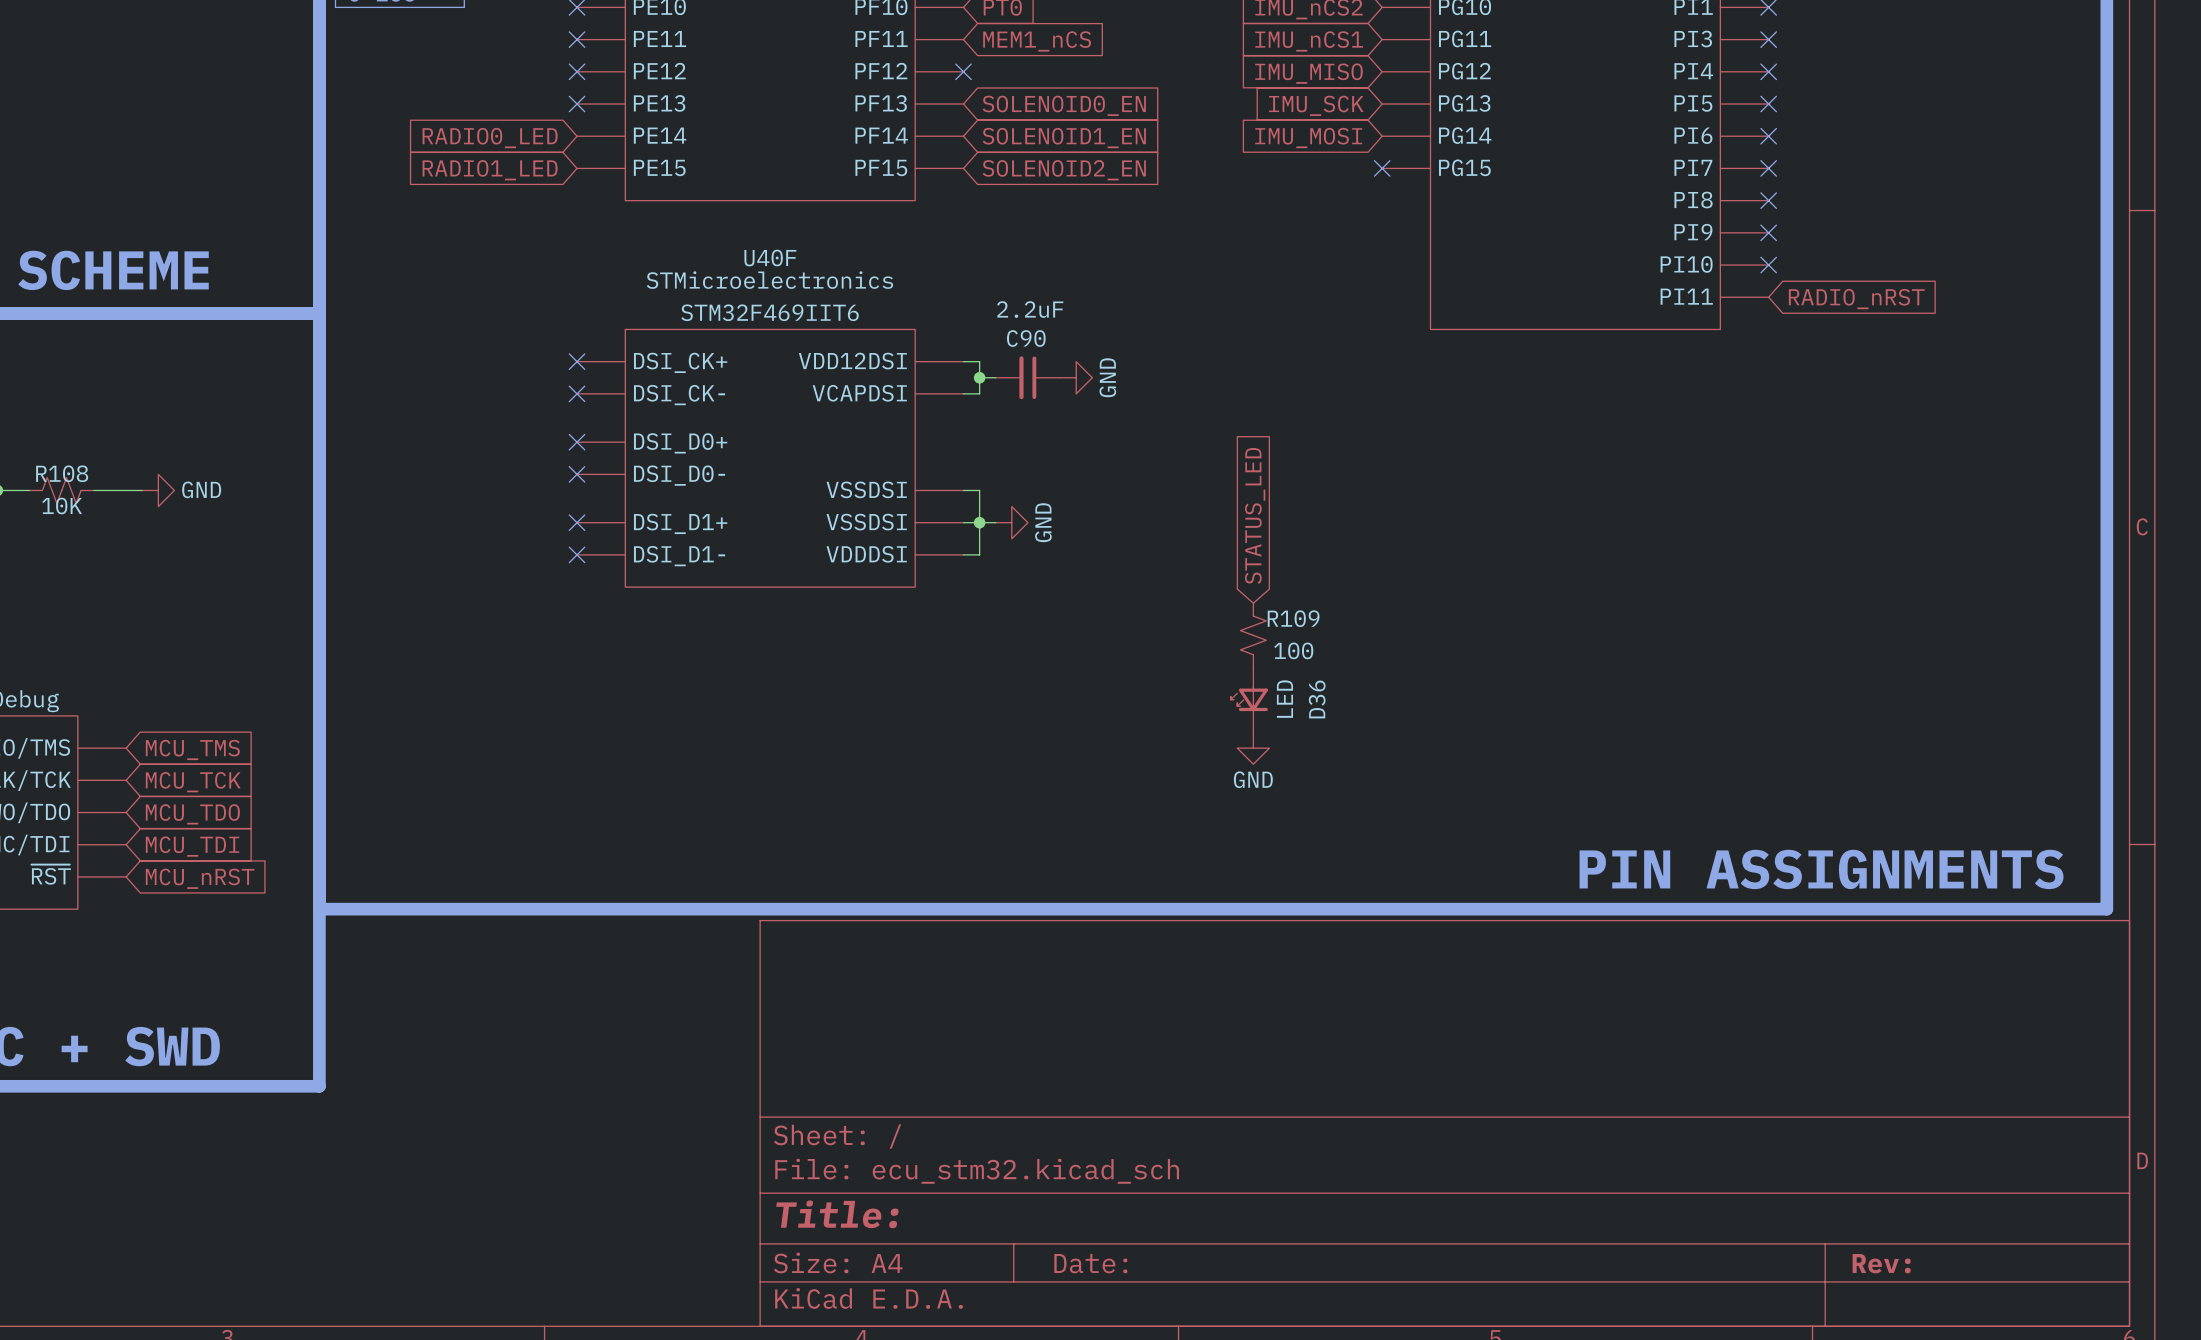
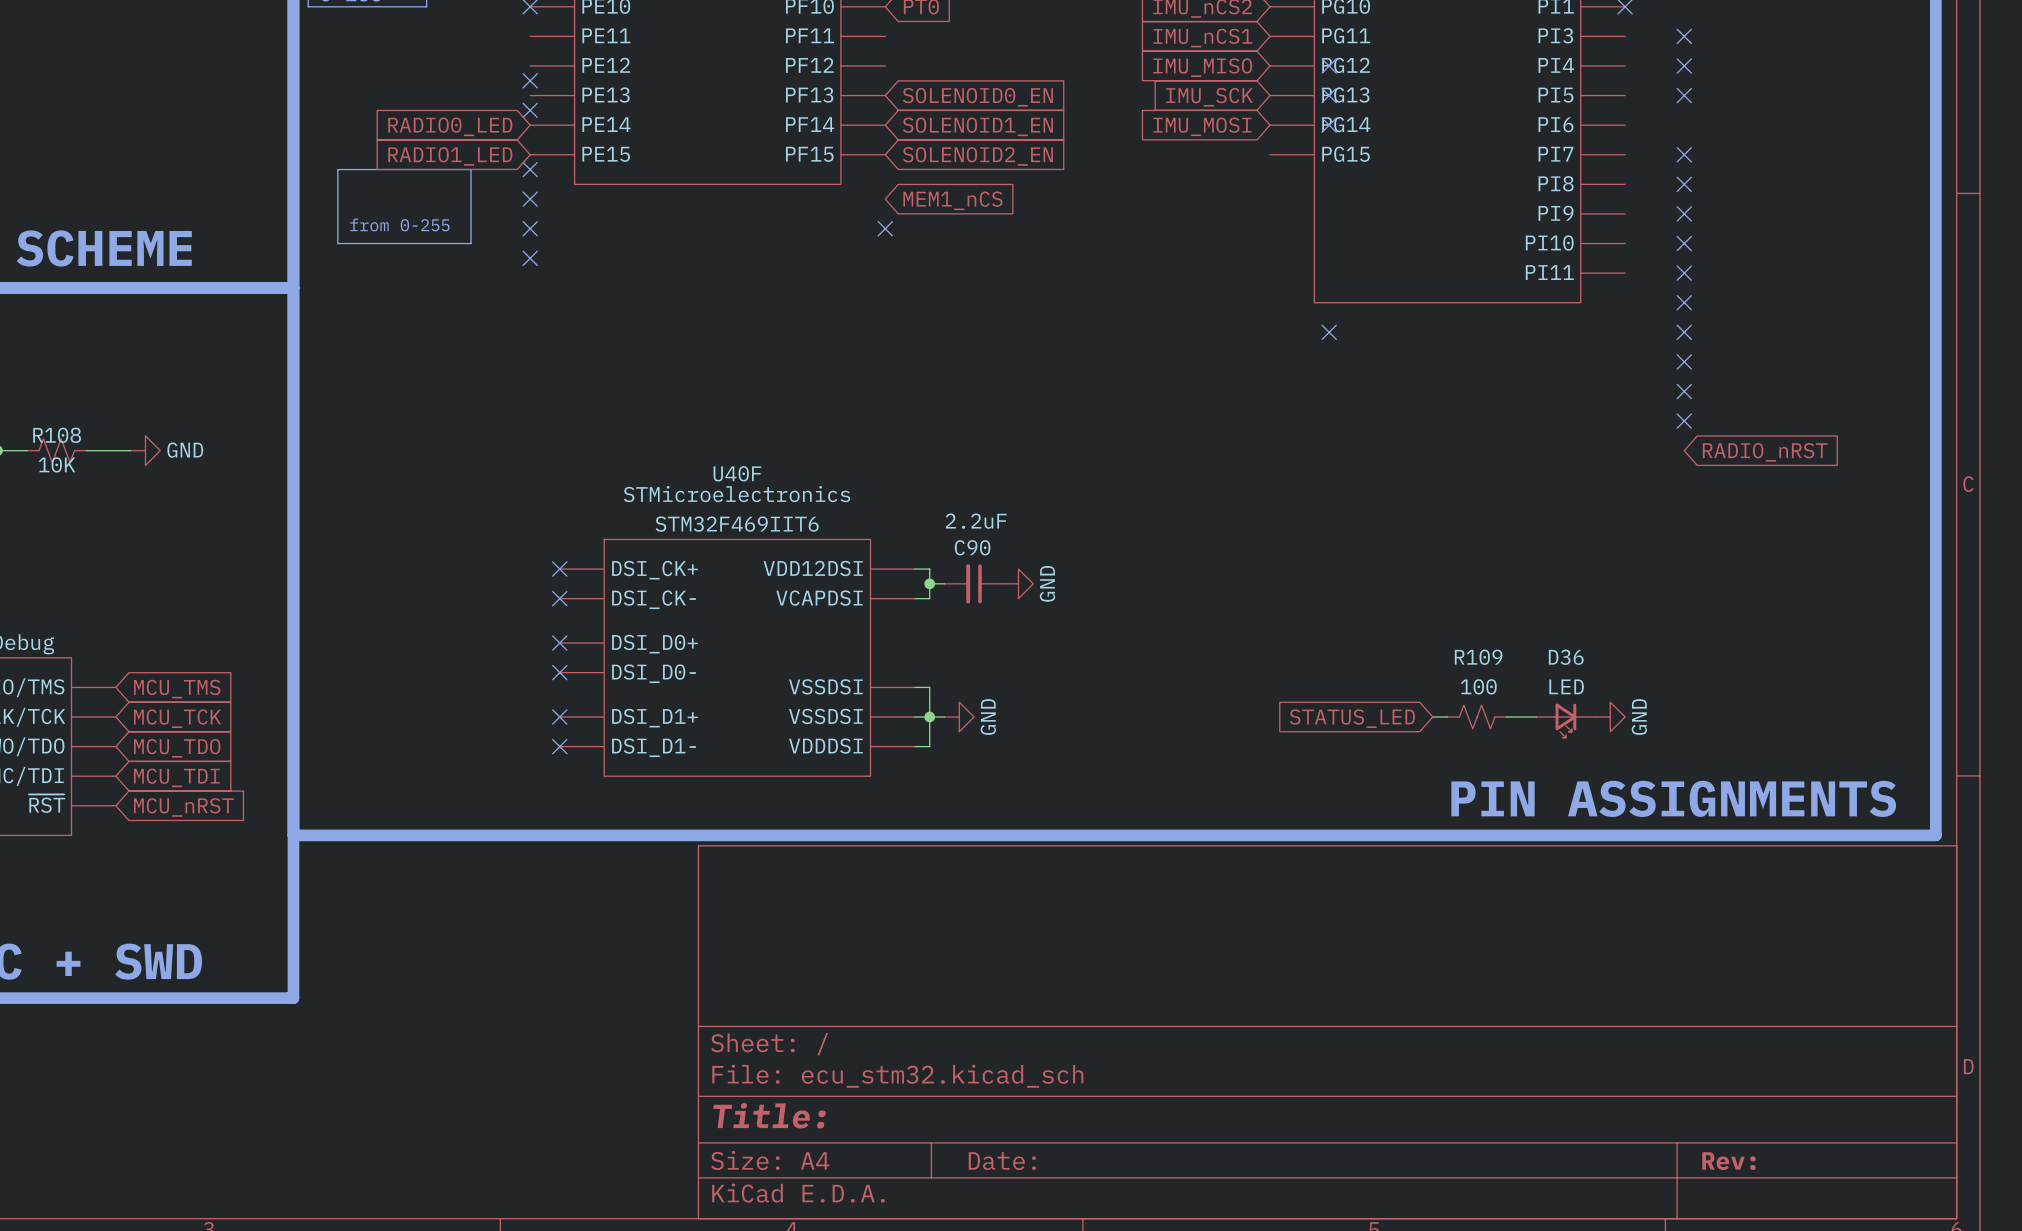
no-connect mark: (577, 39) -> none
no-connect mark: (1768, 39) -> none
no-connect mark: none -> (1684, 36)
global label position: MEM1_nCS (1037, 41) -> MEM1_nCS (952, 200)
no-connect mark: (577, 71) -> none
no-connect mark: (963, 71) -> none
no-connect mark: none -> (1329, 65)
no-connect mark: (1768, 71) -> none
no-connect mark: none -> (1684, 65)
no-connect mark: none -> (530, 80)
no-connect mark: (577, 104) -> none
no-connect mark: none -> (1329, 95)
no-connect mark: (1768, 104) -> none
no-connect mark: none -> (1684, 95)
no-connect mark: none -> (530, 110)
no-connect mark: none -> (1329, 125)
no-connect mark: (1768, 136) -> none
no-connect mark: (1382, 168) -> none
no-connect mark: (1768, 168) -> none
no-connect mark: none -> (1684, 154)
line: none -> (337, 169) (471, 169) (471, 243) (337, 243) (337, 169)
no-connect mark: none -> (530, 169)
no-connect mark: (1768, 200) -> none
no-connect mark: none -> (1684, 184)
no-connect mark: none -> (530, 199)
no-connect mark: (1768, 232) -> none
no-connect mark: none -> (1684, 213)
text: none -> from 0-255 (399, 224)
no-connect mark: none -> (530, 228)
no-connect mark: none -> (885, 228)
no-connect mark: (1768, 265) -> none
no-connect mark: none -> (1684, 243)
no-connect mark: none -> (530, 258)
no-connect mark: none -> (1684, 273)
global label position: RADIO_nRST (1856, 299) -> RADIO_nRST (1765, 452)
no-connect mark: none -> (1684, 302)
no-connect mark: (577, 361) -> none
wire: (963, 361) (979, 361) (979, 393) (963, 393) -> (914, 569) (929, 569) (929, 598) (914, 598)
no-connect mark: none -> (1329, 332)
no-connect mark: none -> (1684, 332)
wire: (979, 377) (995, 377) -> (929, 583) (944, 583)
junction: (979, 377) -> none
C90 position: (1027, 377) -> (974, 583)
power symbol: GND (1076, 377) -> none
no-connect mark: (577, 393) -> none
no-connect mark: none -> (1684, 361)
no-connect mark: none -> (1684, 391)
no-connect mark: (577, 442) -> none
U40F position: (770, 458) -> (737, 657)
no-connect mark: none -> (1684, 421)
no-connect mark: (577, 474) -> none
wire: (963, 490) (979, 490) (979, 554) (963, 554) -> (914, 687) (929, 687) (929, 746) (914, 746)
global label: STATUS_LED (1255, 516) -> none
no-connect mark: (577, 522) -> none
wire: (963, 522) (995, 522) -> (914, 717) (944, 717)
junction: (979, 522) -> none
power symbol: GND (1011, 522) -> none
no-connect mark: (577, 554) -> none
R109 name position: R109 (1293, 618) -> R109 (1478, 657)
no-connect mark: none -> (559, 569)
junction: none -> (929, 583)
power symbol: none -> GND (1018, 583)
R109 rotation: 0° (1253, 635) -> 90° clockwise (1477, 717)
R109 position: (1253, 635) -> (1477, 717)
R109 value position: 100 (1293, 650) -> 100 (1478, 686)
no-connect mark: none -> (559, 598)
no-connect mark: none -> (559, 643)
D36 rotation: 0° (1249, 699) -> 90° counterclockwise (1565, 720)
D36 position: (1249, 699) -> (1565, 720)
no-connect mark: none -> (559, 672)
power symbol: GND (1253, 748) -> none
no-connect mark: none -> (559, 717)
junction: none -> (929, 717)
power symbol: none -> GND (959, 717)
wire: none -> (1432, 717) (1447, 717)
wire: none -> (1506, 717) (1536, 717)
power symbol: none -> GND (1610, 717)
global label: none -> STATUS_LED (1352, 718)
no-connect mark: none -> (559, 746)

